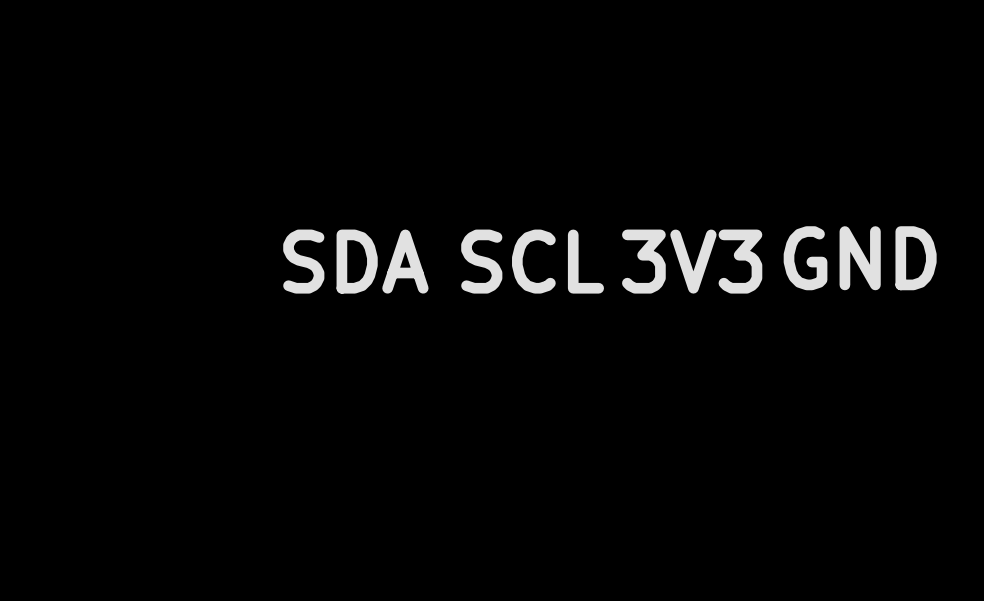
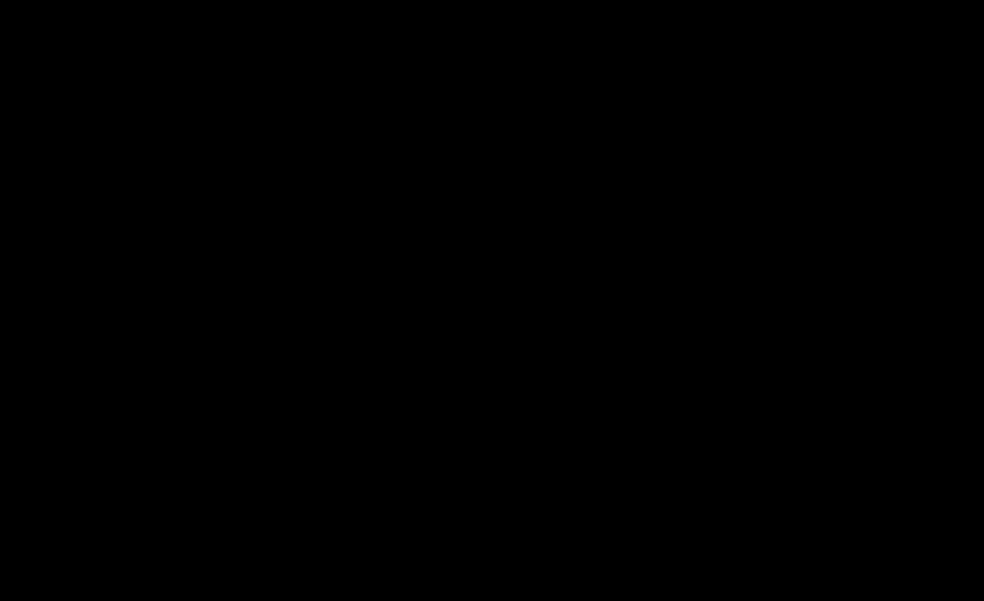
text: GND (860, 258) -> none
text: SDA (355, 261) -> none
text: SCL (532, 261) -> none
text: 3V3 (692, 261) -> none

